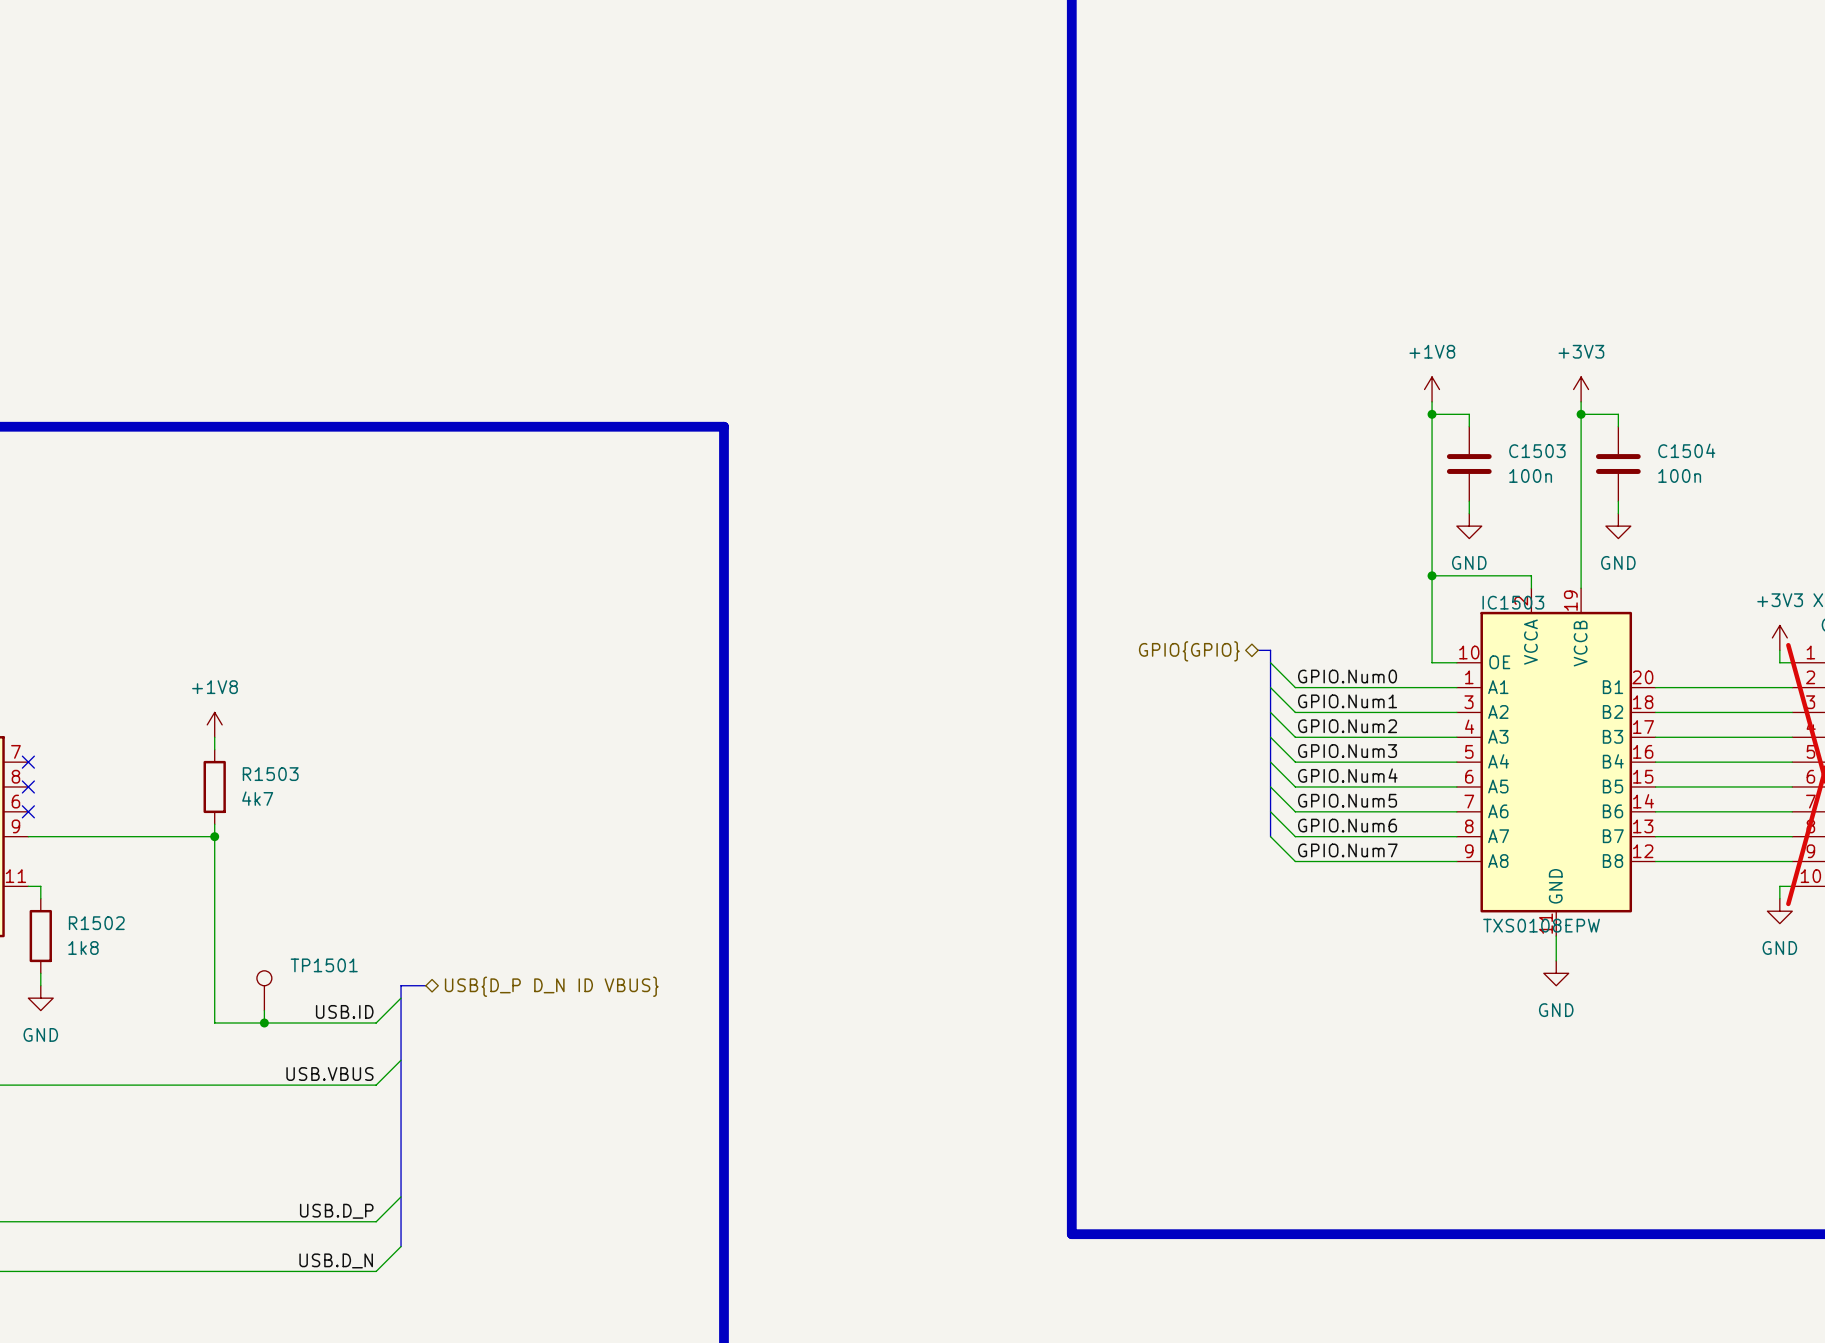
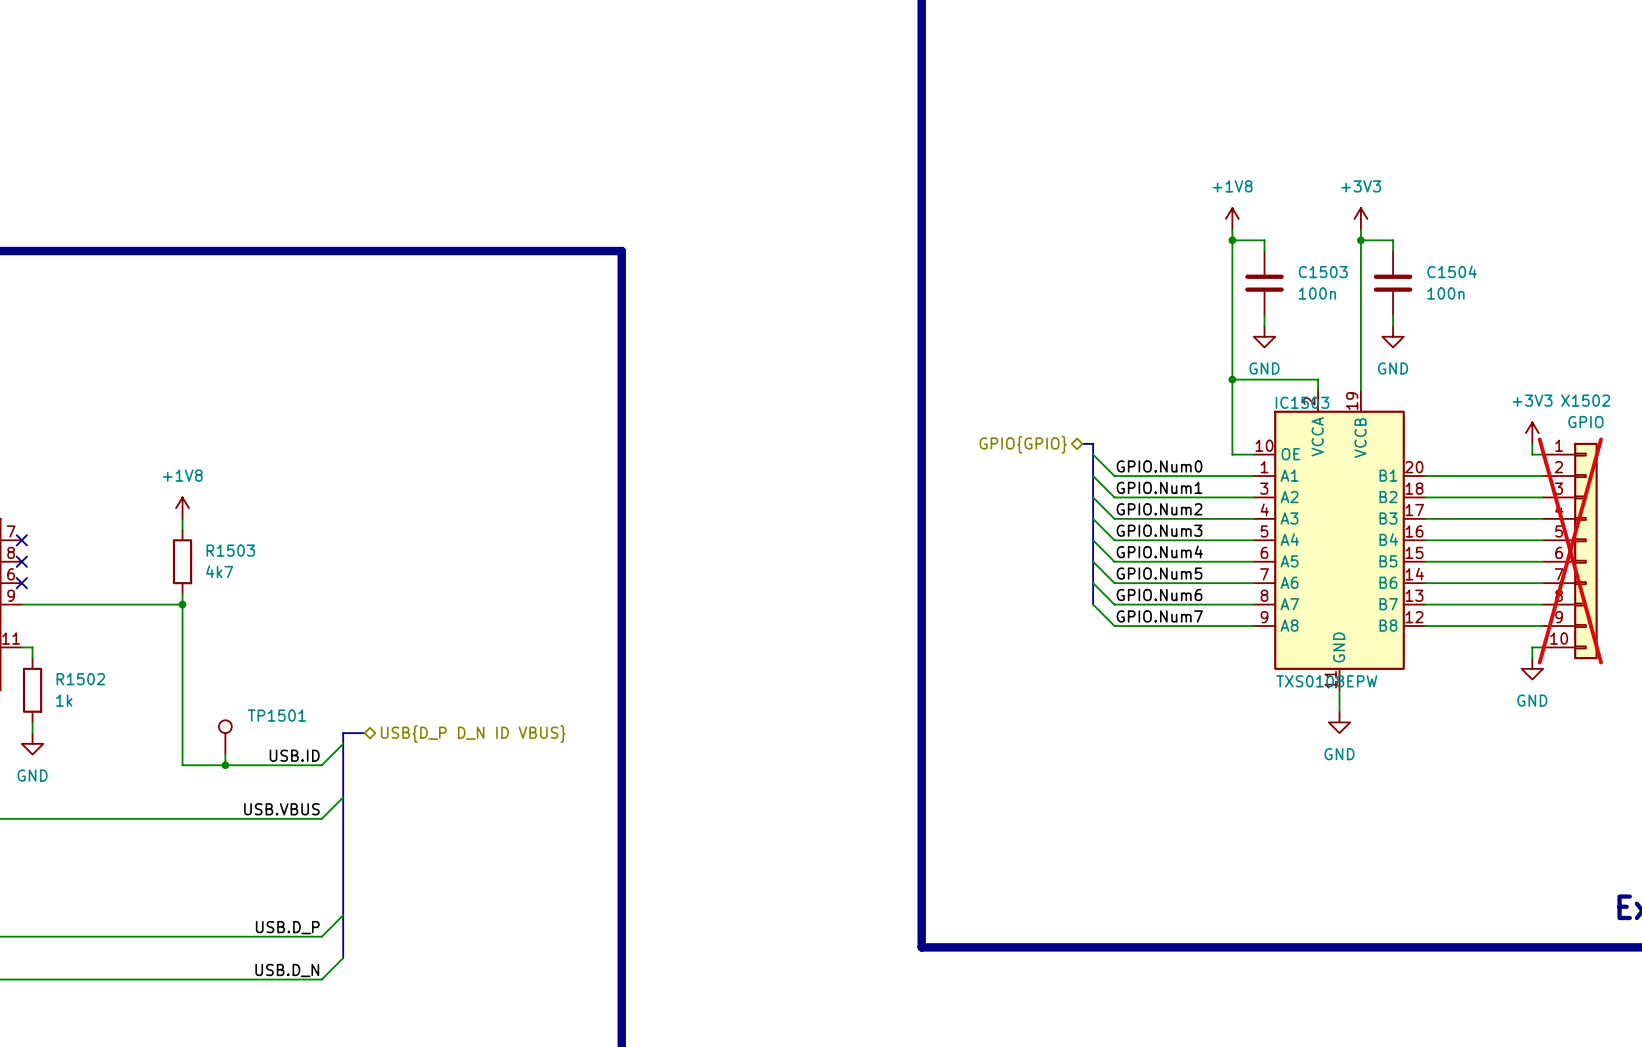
R1502 value: 1k8 (83, 948) -> 1k (64, 700)

